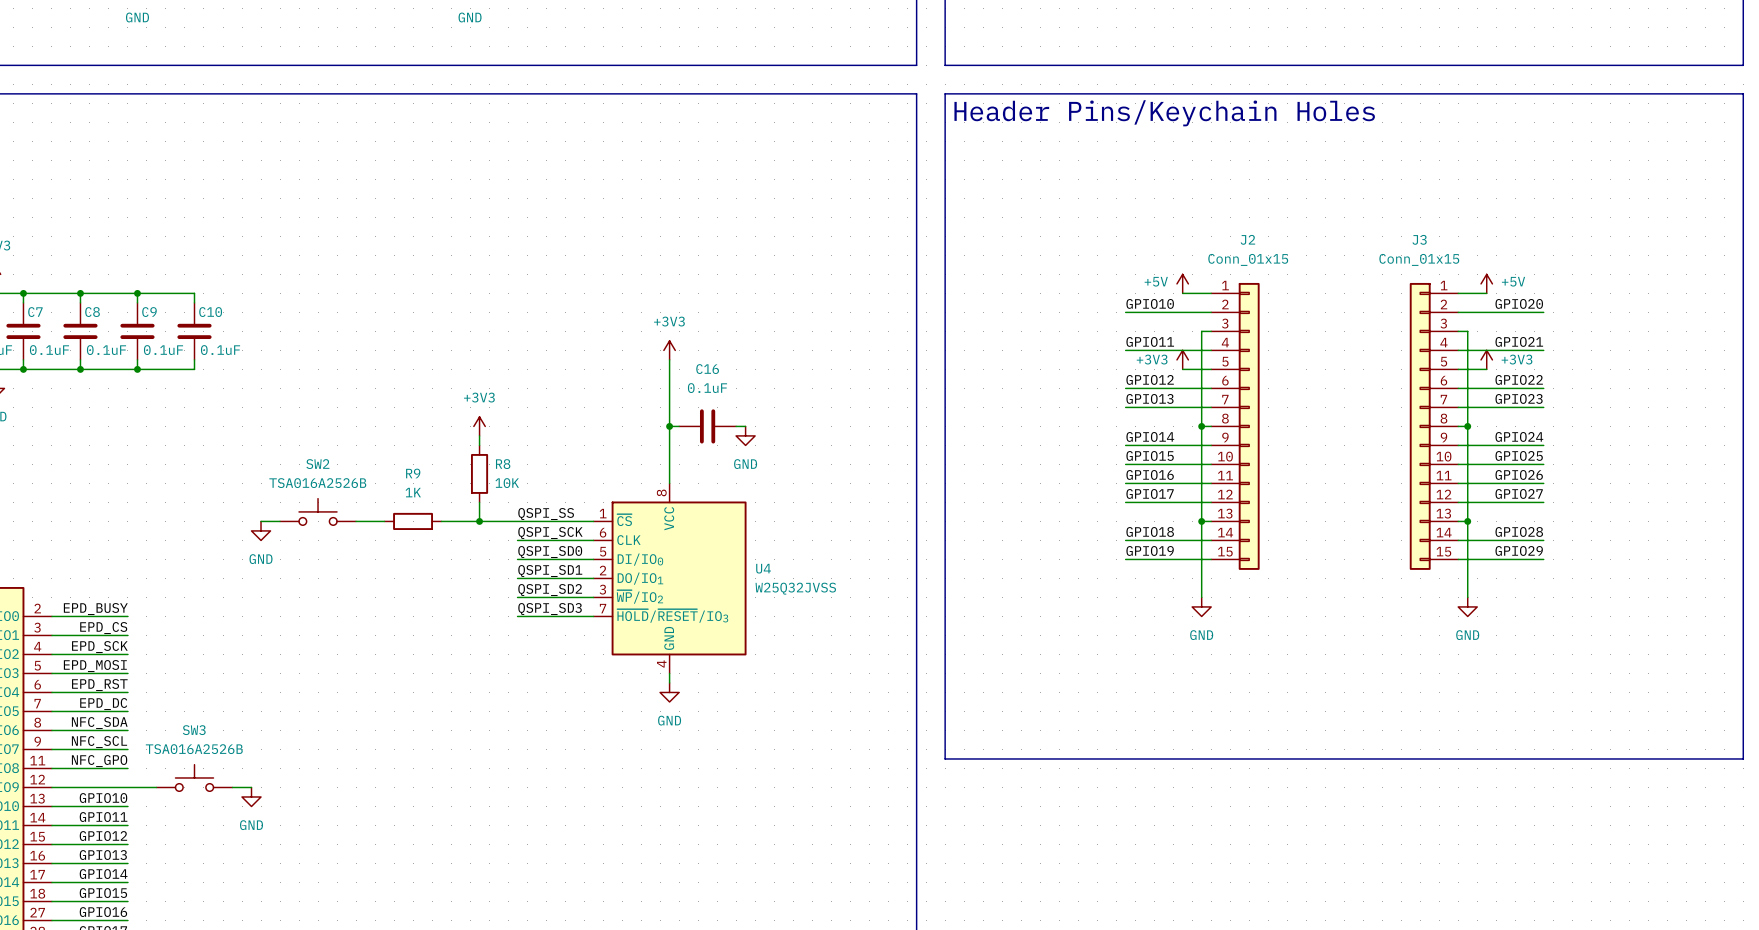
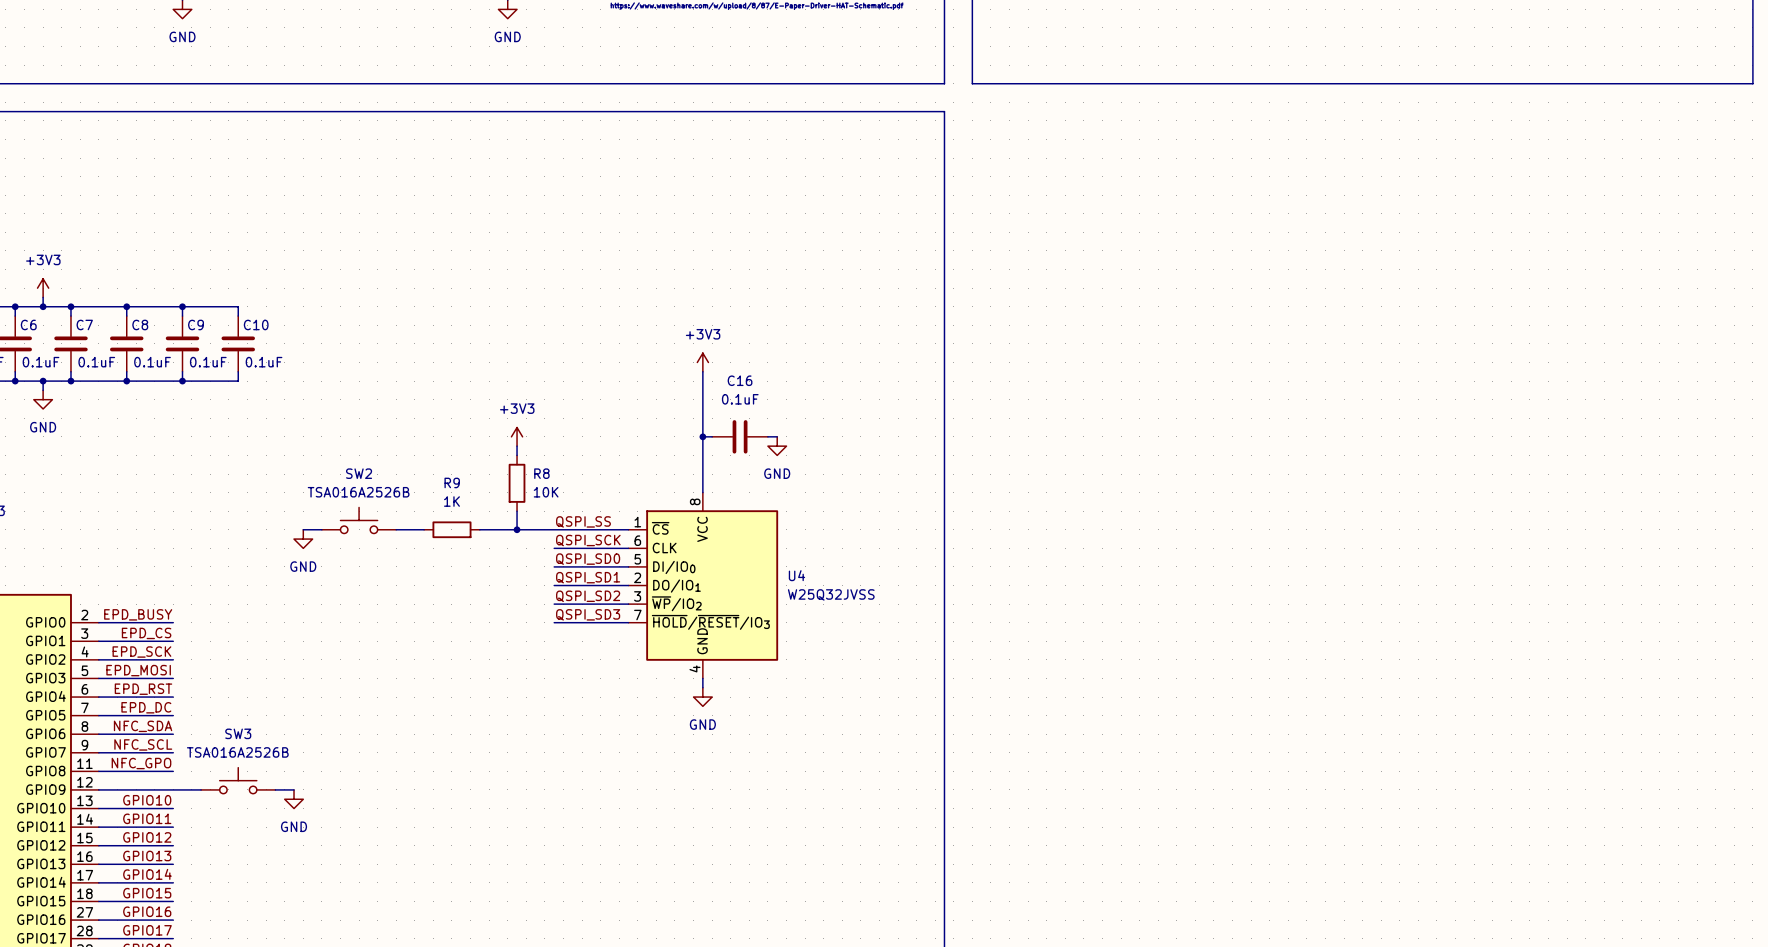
line: (945, 93) (1743, 93) (1743, 758) (945, 758) (945, 93) -> none
text: Header Pins/Keychain Holes (1164, 113) -> none
power symbol: +5V (1182, 283) -> none
power symbol: +5V (1486, 283) -> none
wire: (1182, 293) (1211, 293) -> none
wire: (1458, 293) (1486, 293) -> none
label: GPIO10 (1150, 303) -> none
label: GPIO20 (1519, 303) -> none
wire: (1125, 312) (1211, 312) -> none
wire: (1458, 312) (1543, 312) -> none
wire: (1211, 331) (1201, 331) (1201, 597) -> none
wire: (1458, 331) (1467, 331) (1467, 597) -> none
label: GPIO11 (1150, 341) -> none
label: GPIO21 (1519, 341) -> none
wire: (1125, 350) (1211, 350) -> none
wire: (1458, 350) (1543, 350) -> none
power symbol: +3V3 (1182, 359) -> none
power symbol: +3V3 (1486, 359) -> none
wire: (1182, 369) (1211, 369) -> none
wire: (1458, 369) (1486, 369) -> none
label: GPIO12 (1150, 379) -> none
label: GPIO22 (1519, 379) -> none
wire: (1125, 388) (1211, 388) -> none
wire: (1458, 388) (1543, 388) -> none
label: GPIO13 (1149, 398) -> none
label: GPIO23 (1519, 398) -> none
wire: (1125, 407) (1211, 407) -> none
wire: (1458, 407) (1543, 407) -> none
wire: (1201, 426) (1211, 426) -> none
junction: (1201, 426) -> none
J2: Conn_01x15 (1235, 426) -> none
J3: Conn_01x15 (1433, 426) -> none
wire: (1458, 426) (1467, 426) -> none
junction: (1467, 426) -> none
label: GPIO14 (1150, 436) -> none
label: GPIO24 (1519, 436) -> none
wire: (1125, 445) (1211, 445) -> none
wire: (1458, 445) (1543, 445) -> none
label: GPIO15 (1150, 455) -> none
label: GPIO25 (1519, 455) -> none
wire: (1125, 464) (1211, 464) -> none
wire: (1458, 464) (1543, 464) -> none
label: GPIO16 (1150, 474) -> none
label: GPIO26 (1519, 474) -> none
wire: (1125, 483) (1211, 483) -> none
wire: (1458, 483) (1543, 483) -> none
label: GPIO17 (1150, 493) -> none
label: GPIO27 (1519, 493) -> none
wire: (1125, 502) (1211, 502) -> none
wire: (1458, 502) (1543, 502) -> none
wire: (1201, 521) (1211, 521) -> none
junction: (1201, 521) -> none
wire: (1458, 521) (1467, 521) -> none
junction: (1467, 521) -> none
label: GPIO18 (1150, 531) -> none
label: GPIO28 (1519, 531) -> none
wire: (1125, 540) (1211, 540) -> none
wire: (1458, 540) (1543, 540) -> none
label: GPIO19 (1150, 550) -> none
label: GPIO29 (1519, 550) -> none
wire: (1125, 559) (1211, 559) -> none
wire: (1458, 559) (1543, 559) -> none
power symbol: GND (1201, 606) -> none
power symbol: GND (1467, 606) -> none

